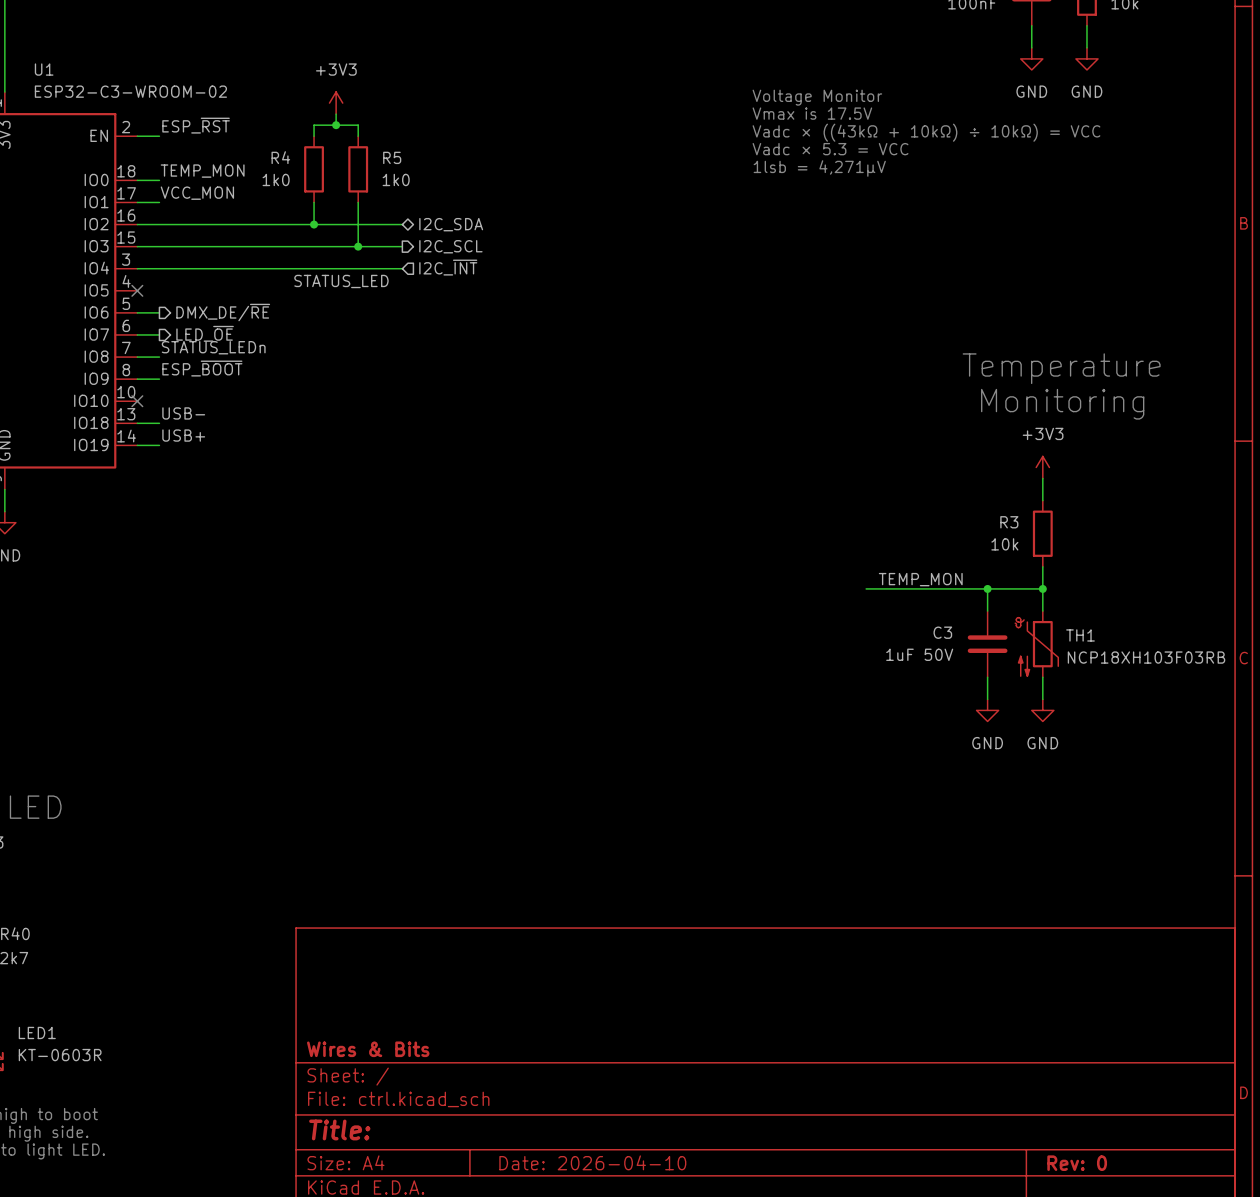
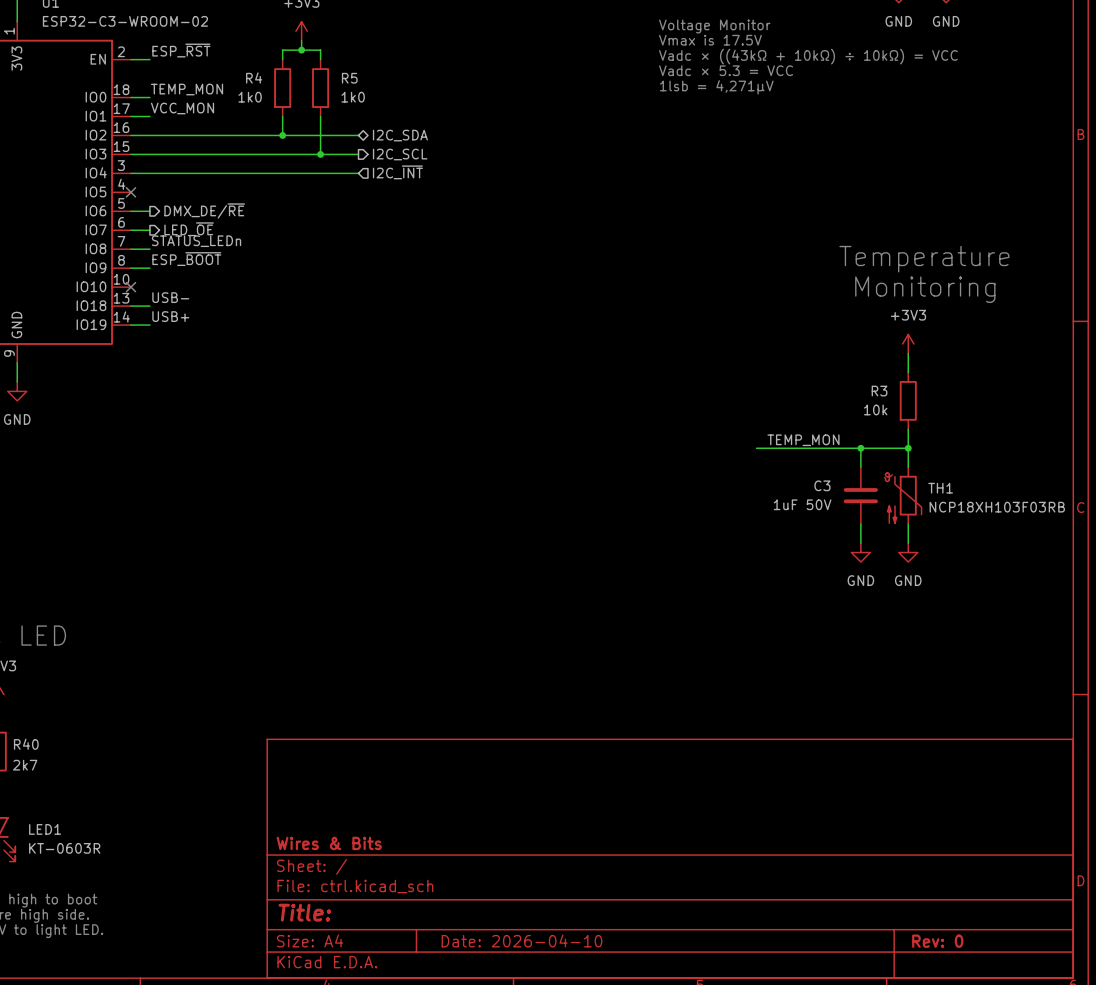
label: STATUS_LED (341, 281) -> none

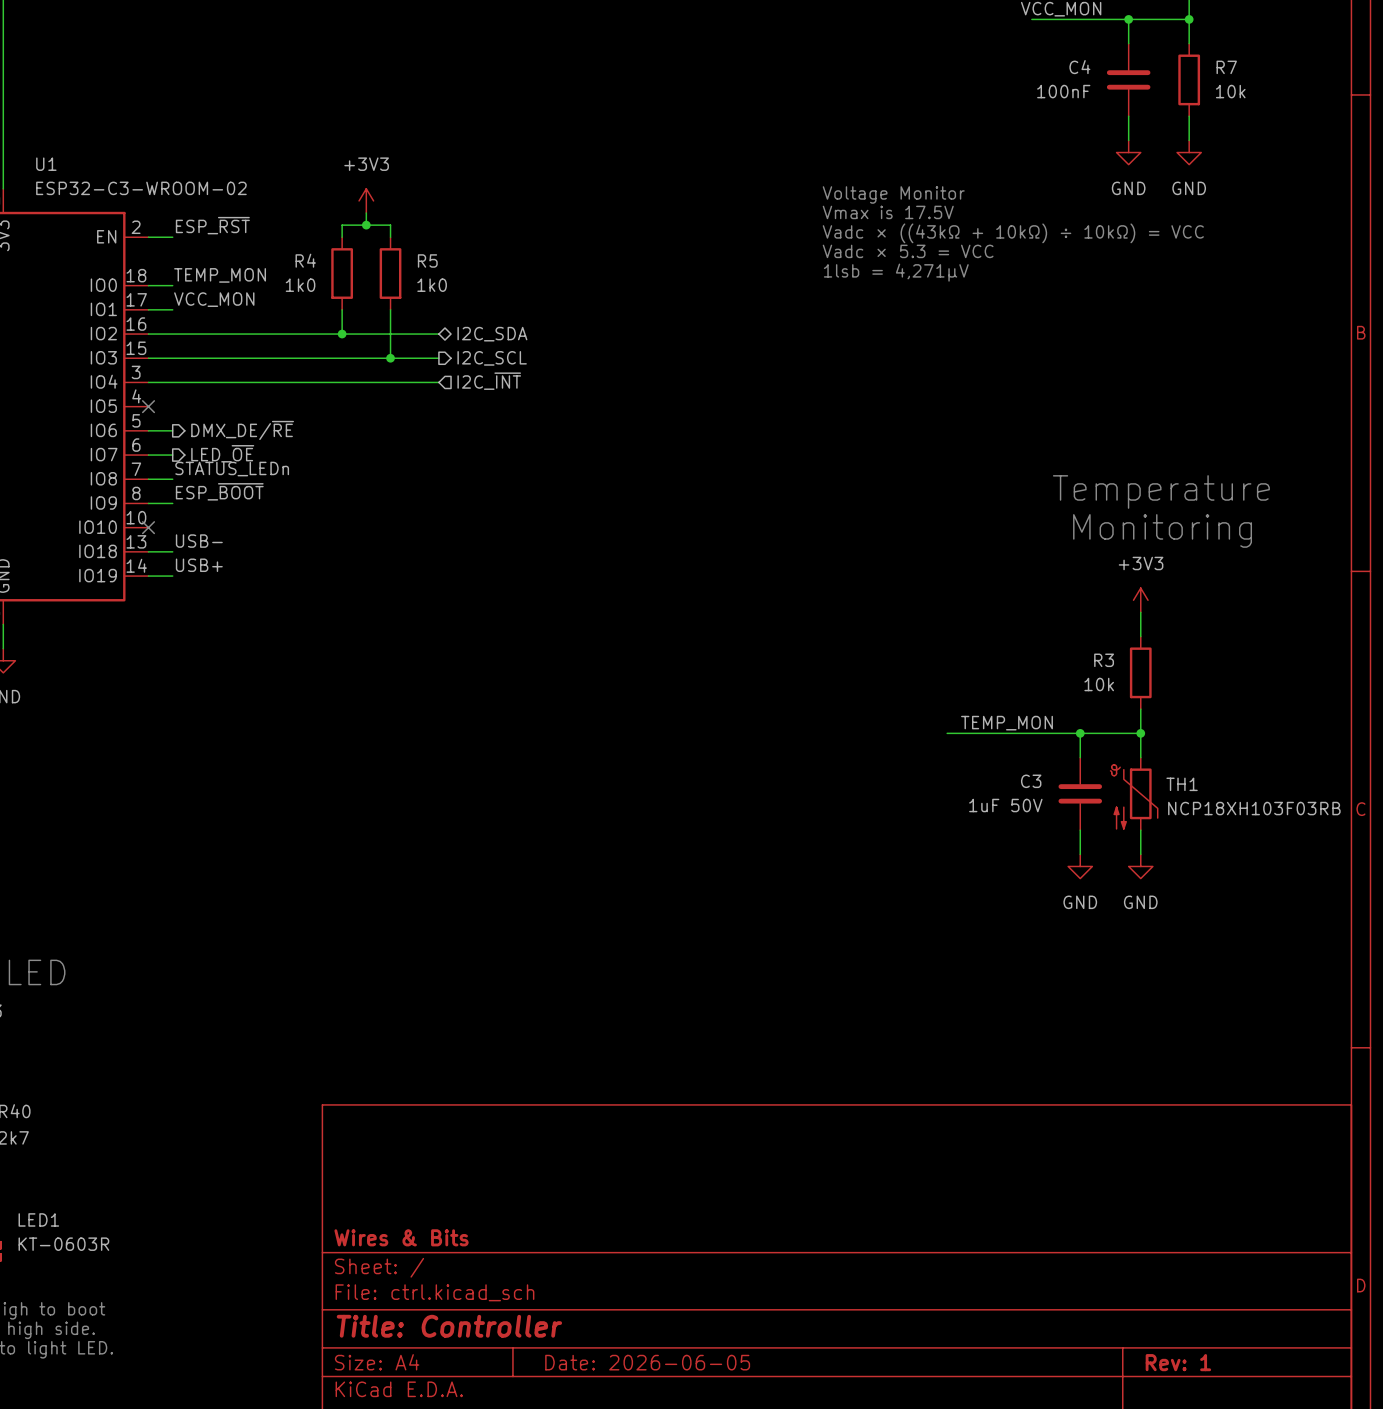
title block: Title: (304, 912) -> Title: Controller (449, 1326)
title block: Date: 2026-04-10 (521, 940) -> Date: 2026-06-05 (647, 1362)
title block: Rev: 0 (937, 941) -> Rev: 1 (1178, 1362)

